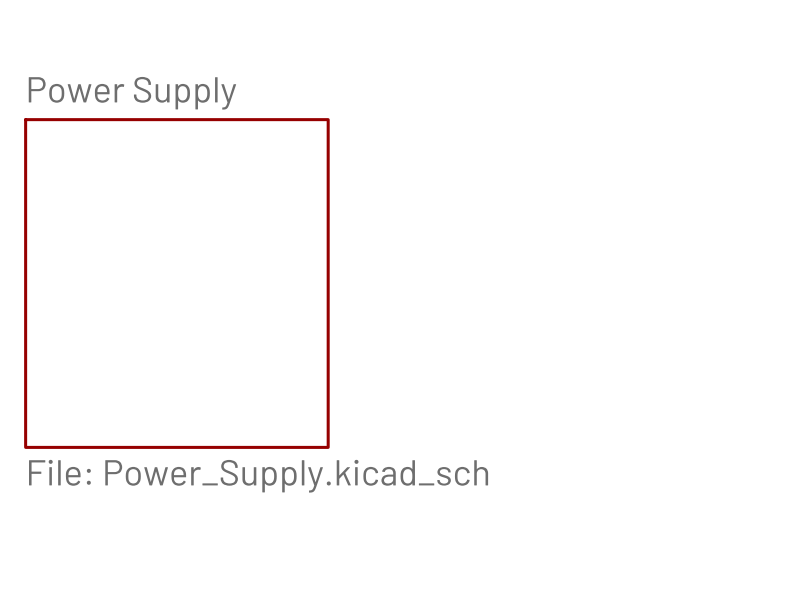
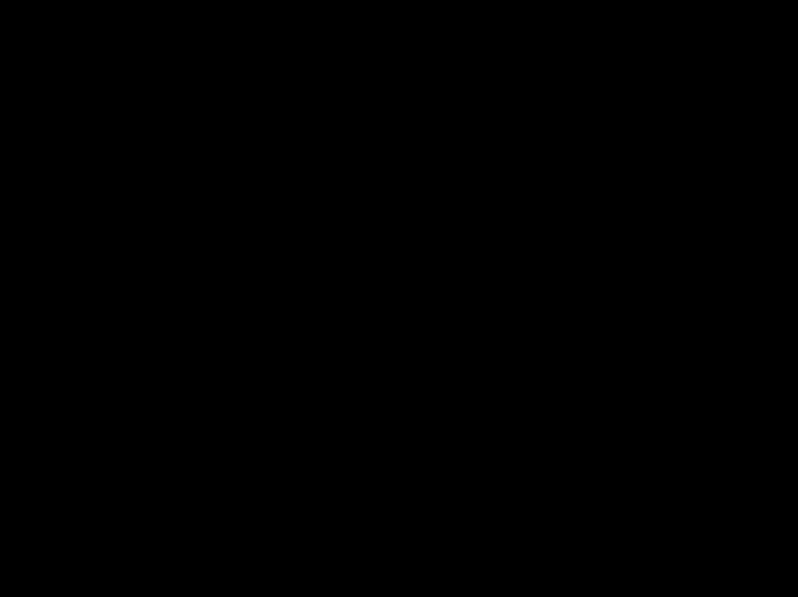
sheet Power Supply: File: Power_Supply.kicad_sch (176, 283) -> none

